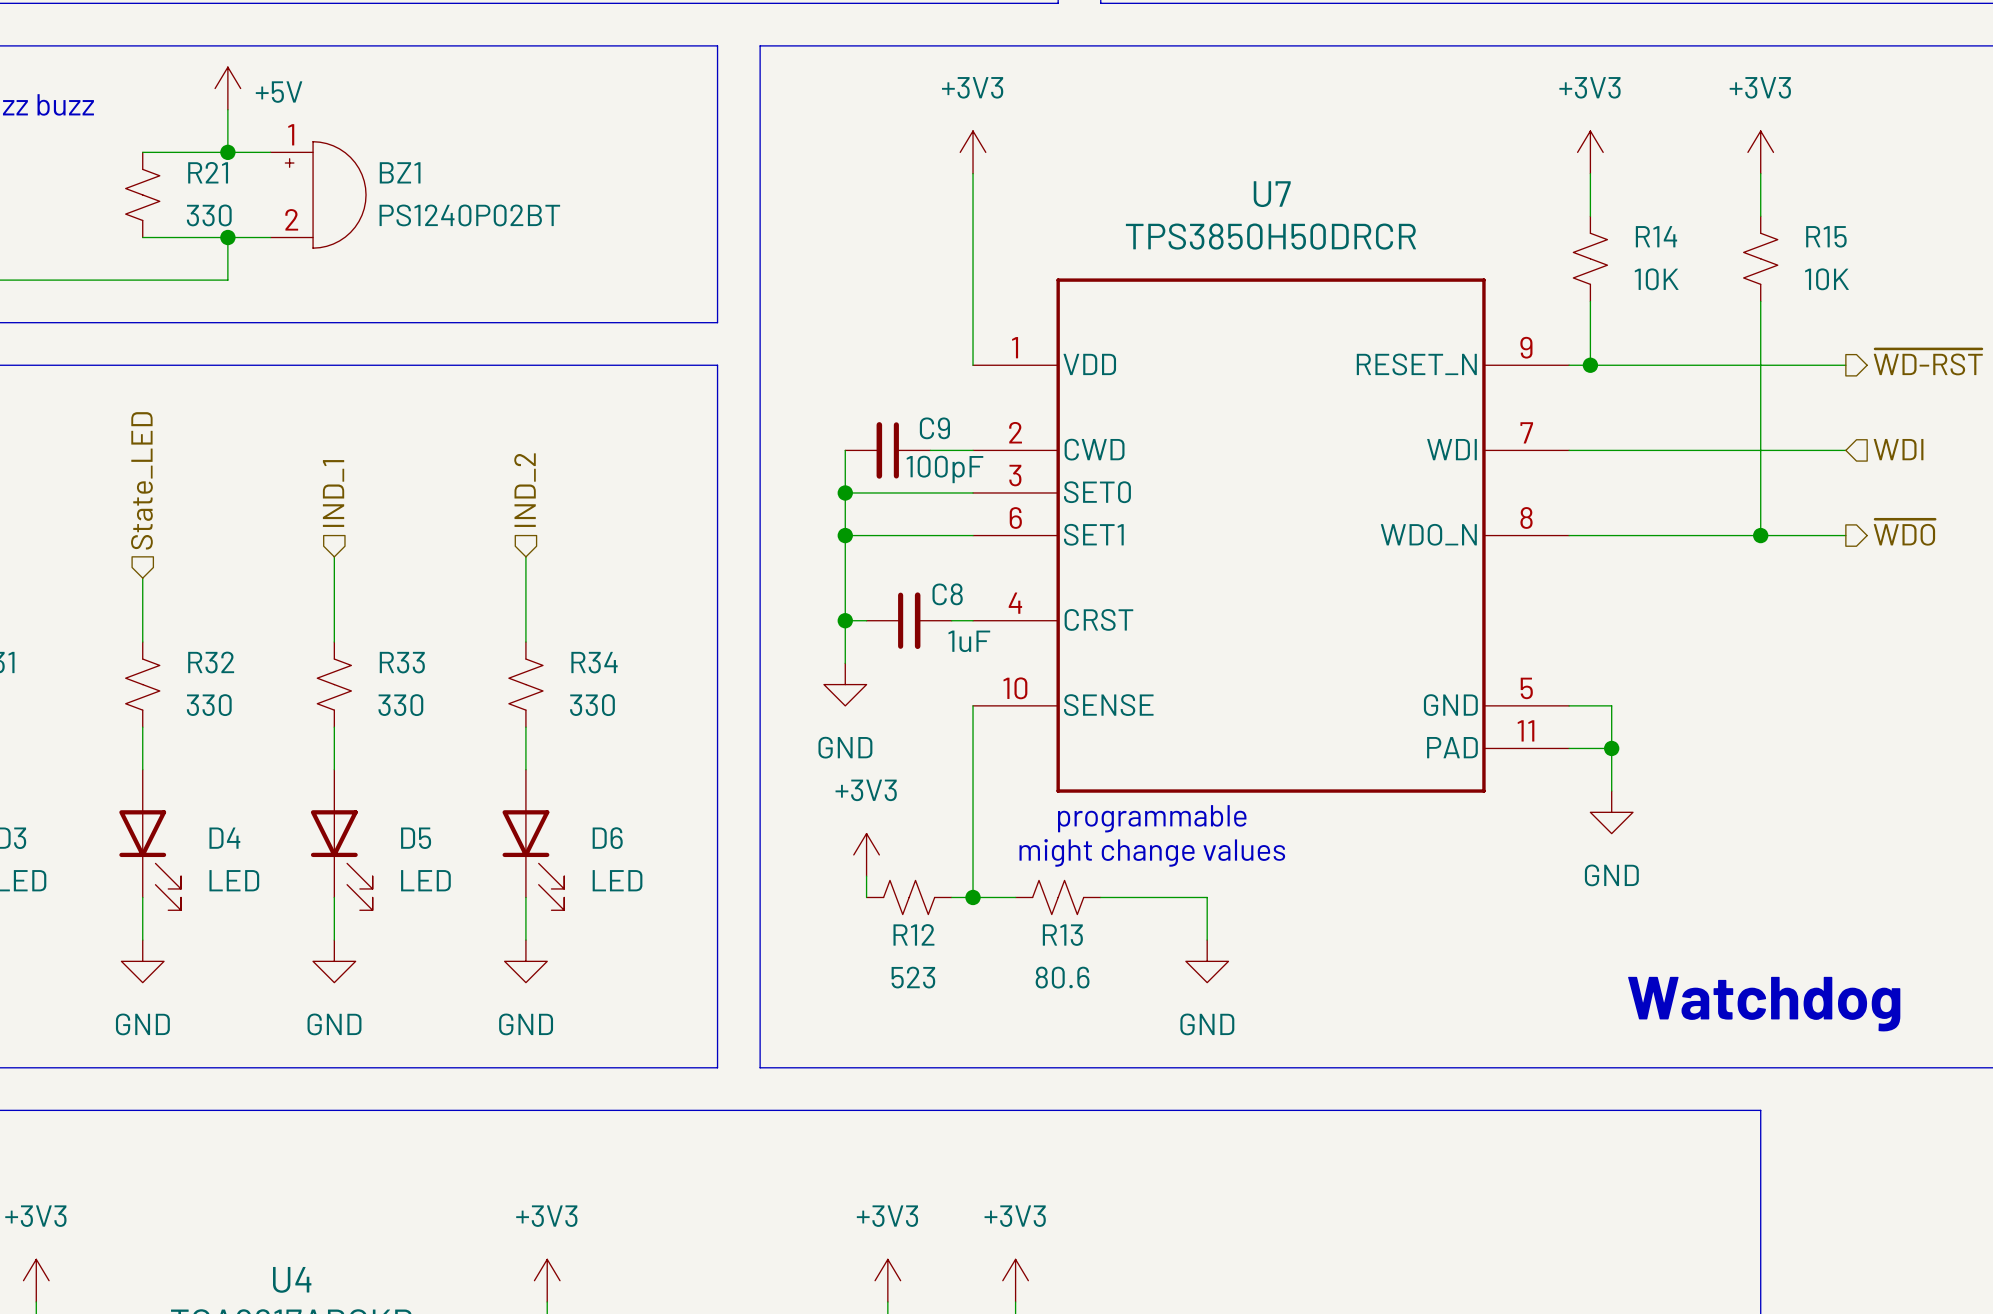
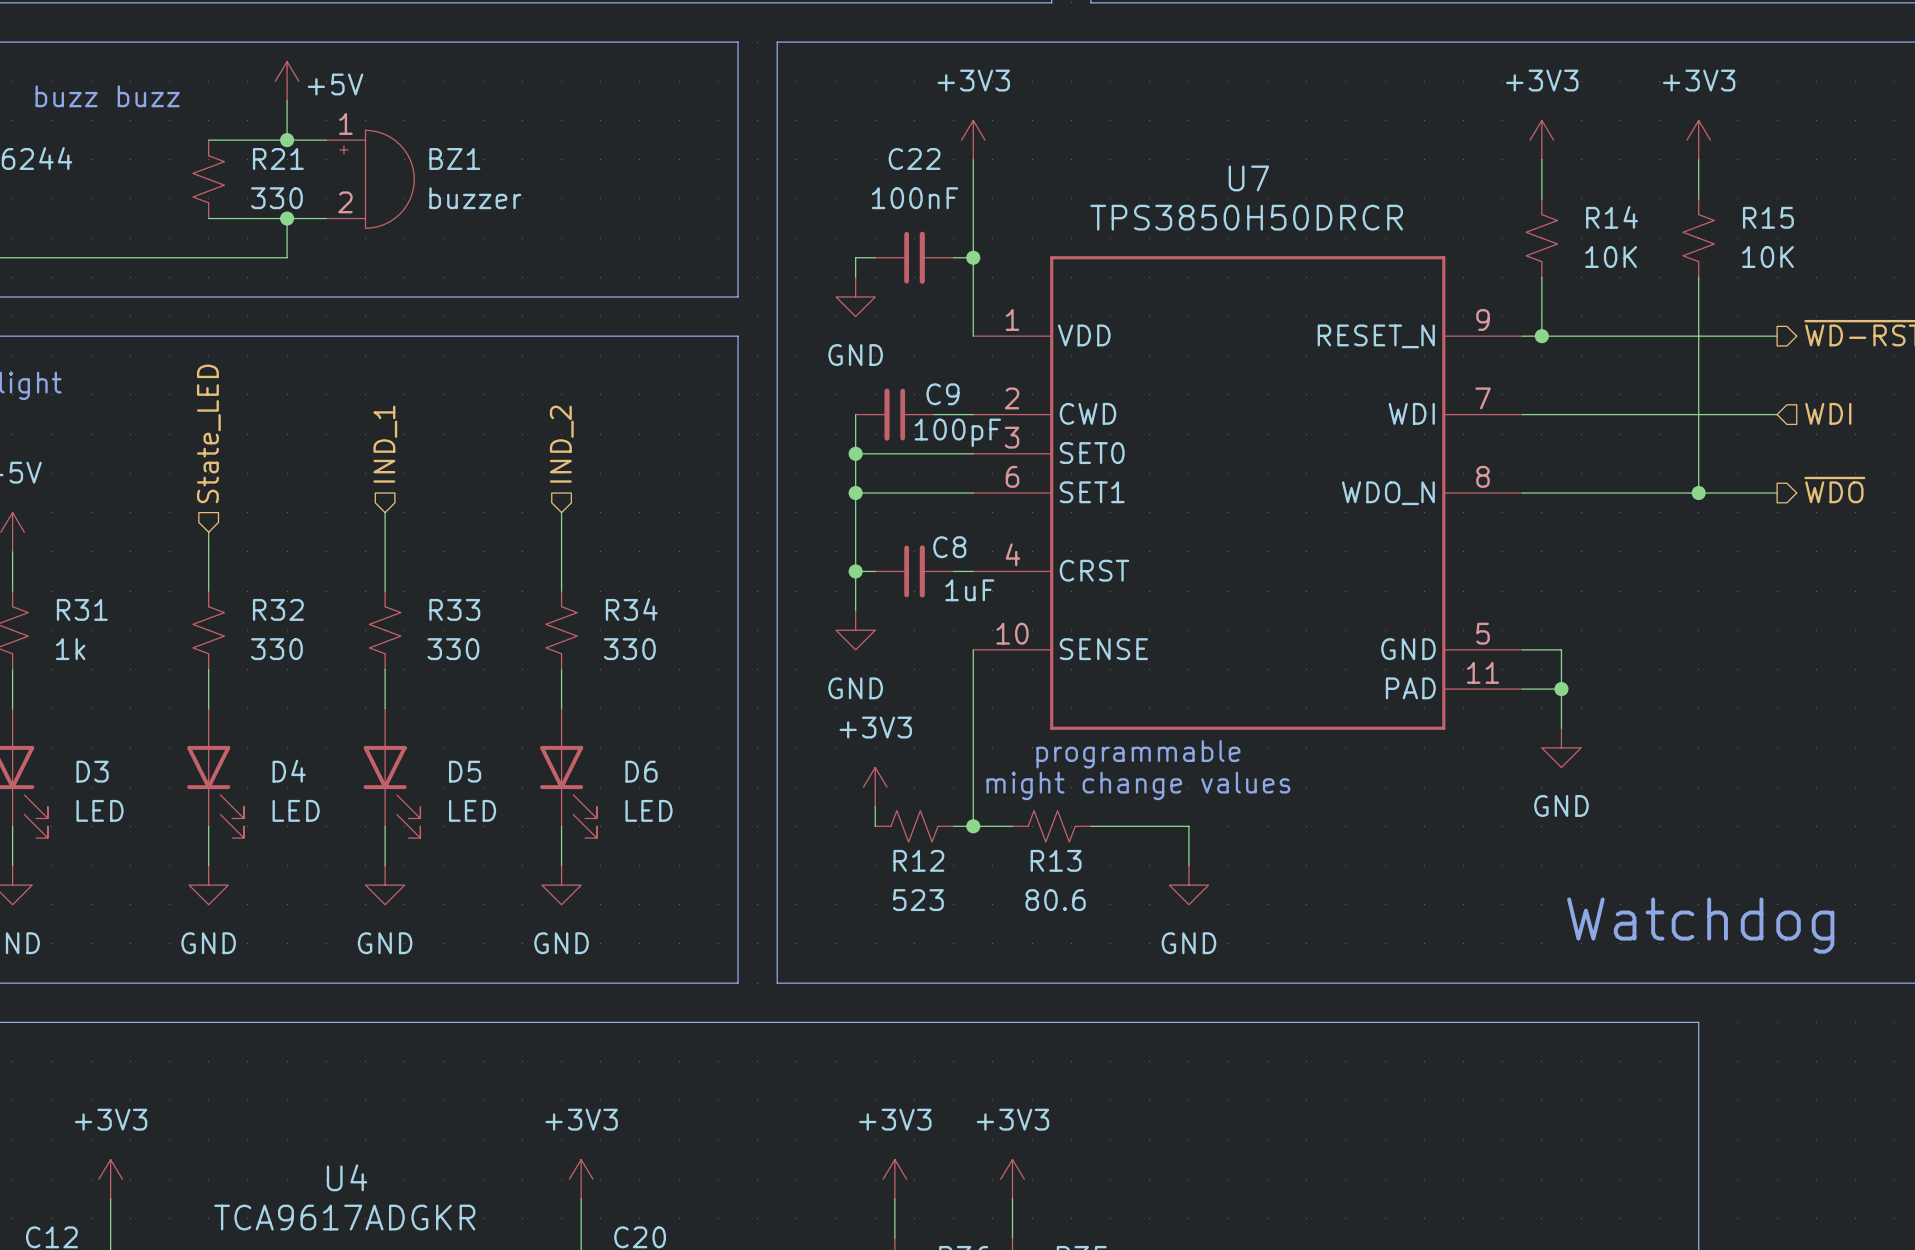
BZ1 value: PS1240P02BT (469, 215) -> buzzer (475, 198)
wire: none -> (875, 257) (855, 257) (855, 277)
C22: none -> 100nF (914, 257)
wire: none -> (953, 257) (973, 257)
junction: none -> (973, 257)
power symbol: none -> GND (855, 296)

